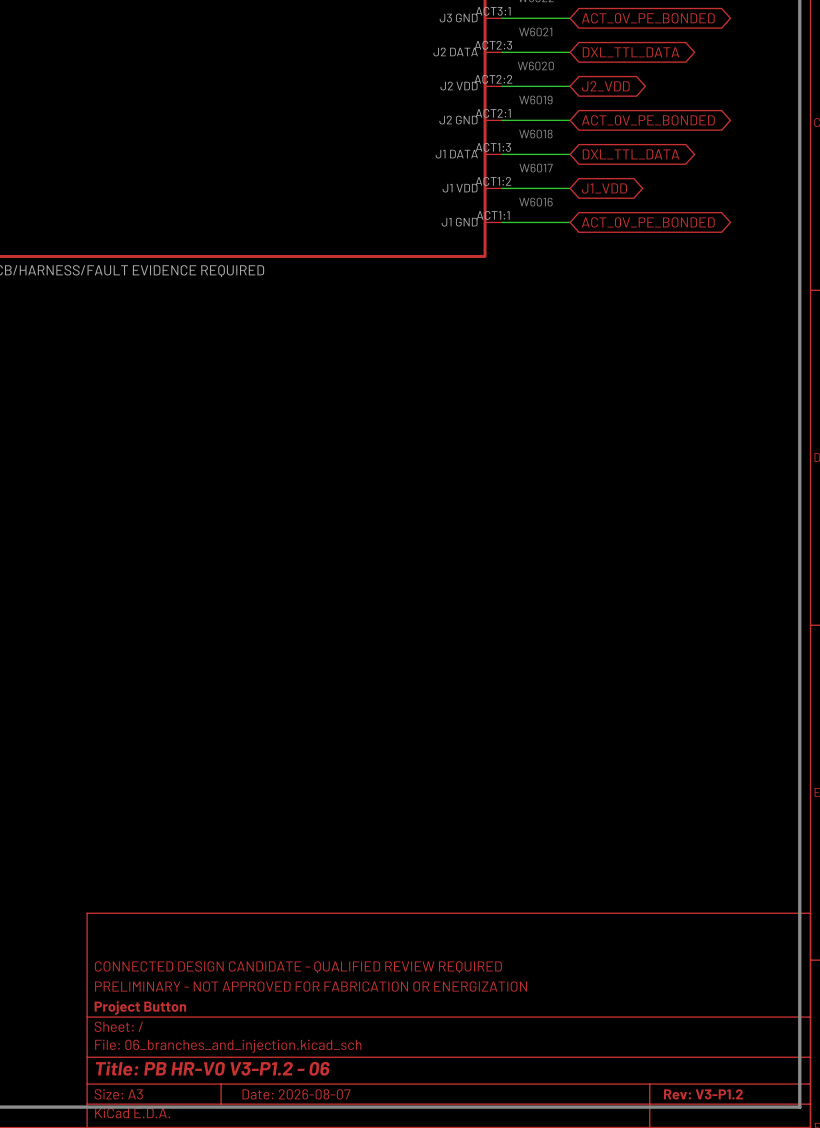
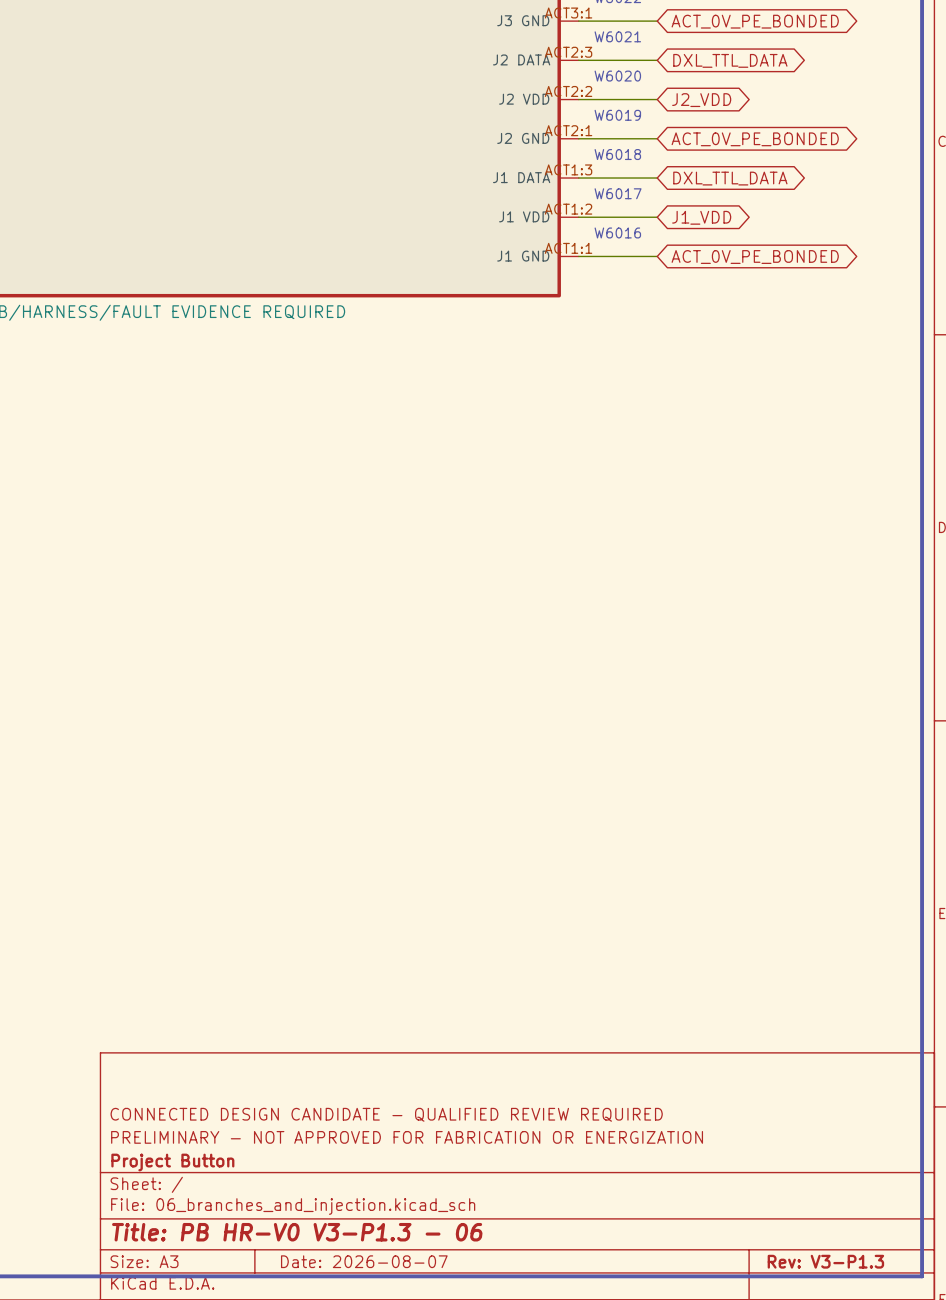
title block: Title: PB HR-V0 V3-P1.2 - 06 (212, 1068) -> Title: PB HR-V0 V3-P1.3 - 06 (297, 1232)
title block: Rev: V3-P1.2 (703, 1094) -> Rev: V3-P1.3 (825, 1261)

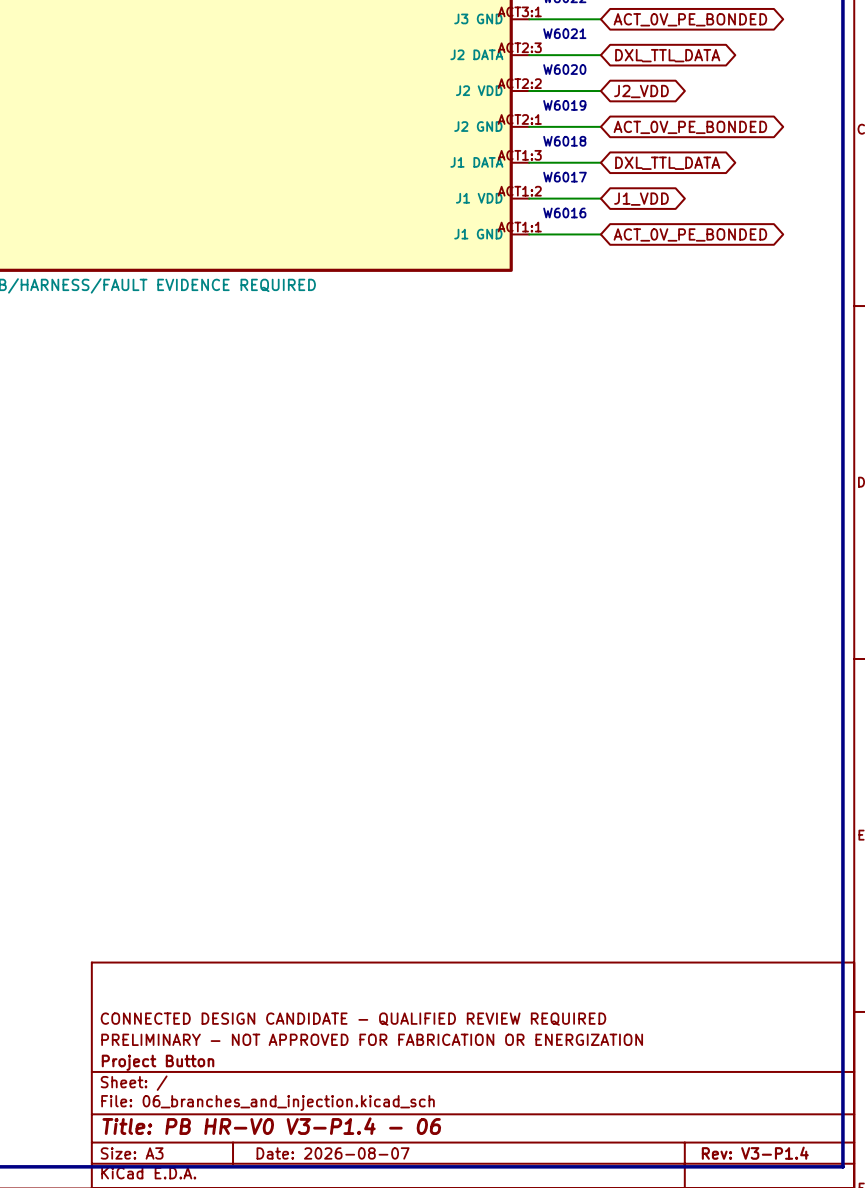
title block: Title: PB HR-V0 V3-P1.3 - 06 (297, 1232) -> Title: PB HR-V0 V3-P1.4 - 06 (271, 1126)
title block: Rev: V3-P1.3 (825, 1261) -> Rev: V3-P1.4 (755, 1153)

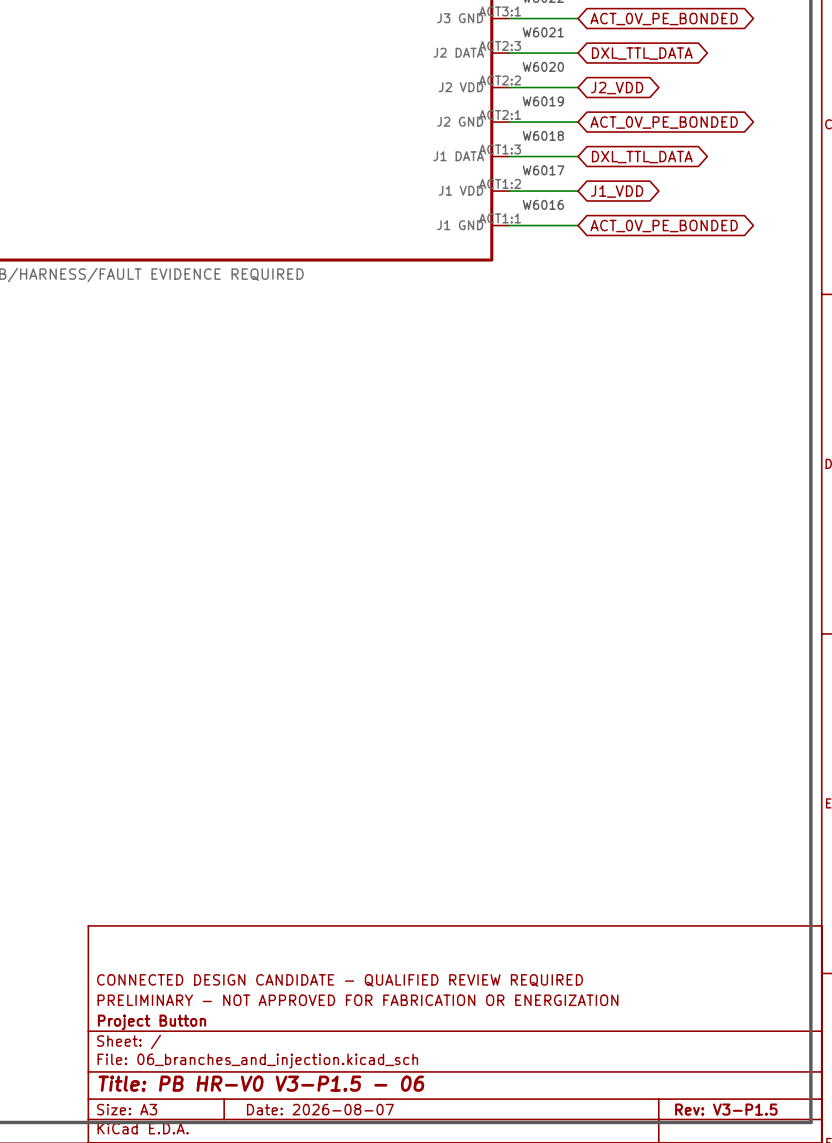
title block: Title: PB HR-V0 V3-P1.4 - 06 (271, 1126) -> Title: PB HR-V0 V3-P1.5 - 06 (261, 1083)
title block: Rev: V3-P1.4 (755, 1153) -> Rev: V3-P1.5 (726, 1109)

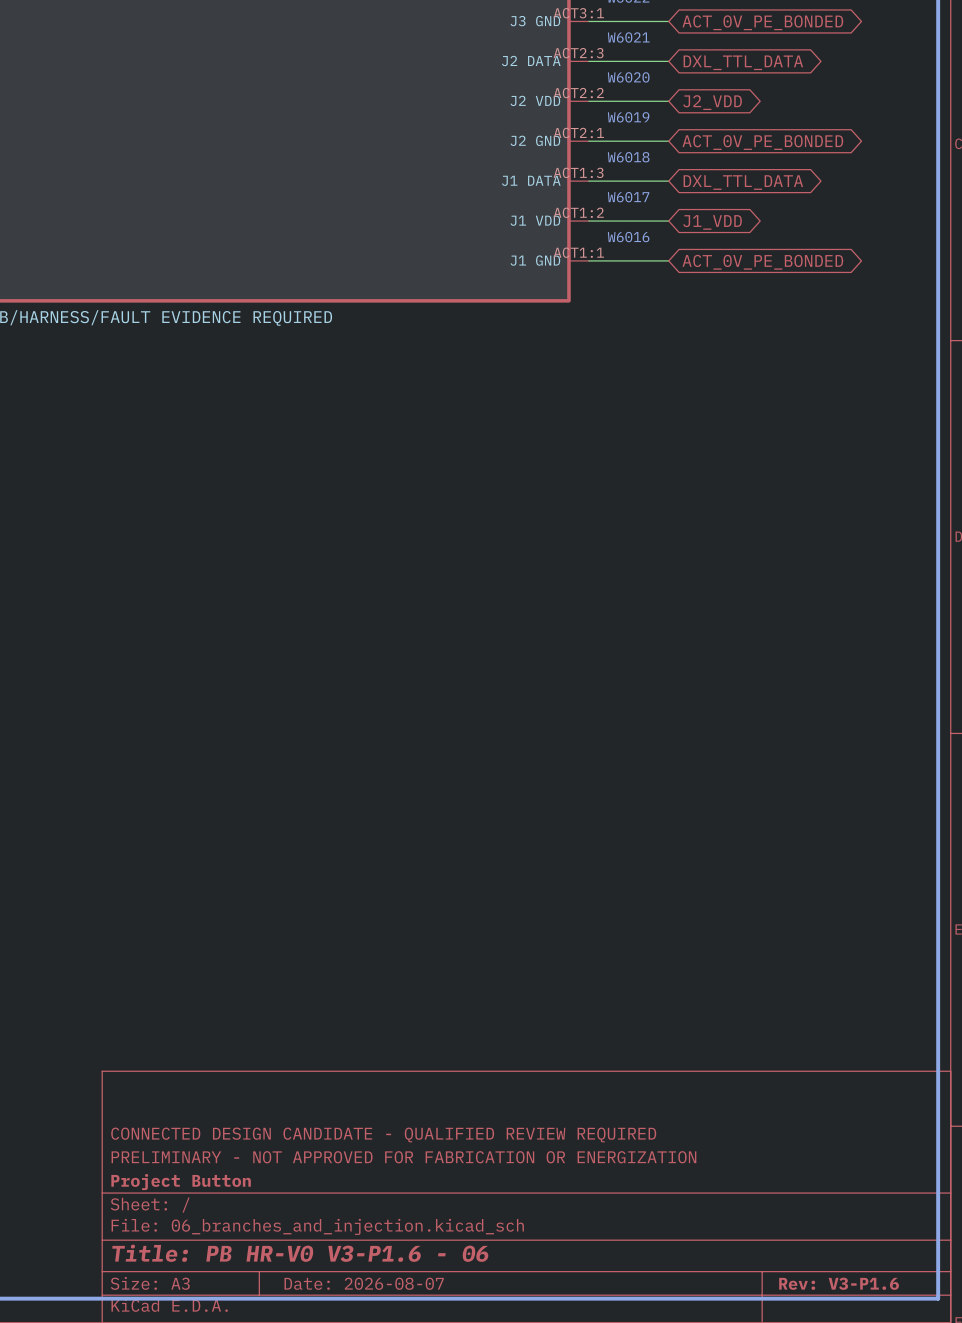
title block: Title: PB HR-V0 V3-P1.5 - 06 (261, 1083) -> Title: PB HR-V0 V3-P1.6 - 06 (300, 1253)
title block: Rev: V3-P1.5 (726, 1109) -> Rev: V3-P1.6 (839, 1283)

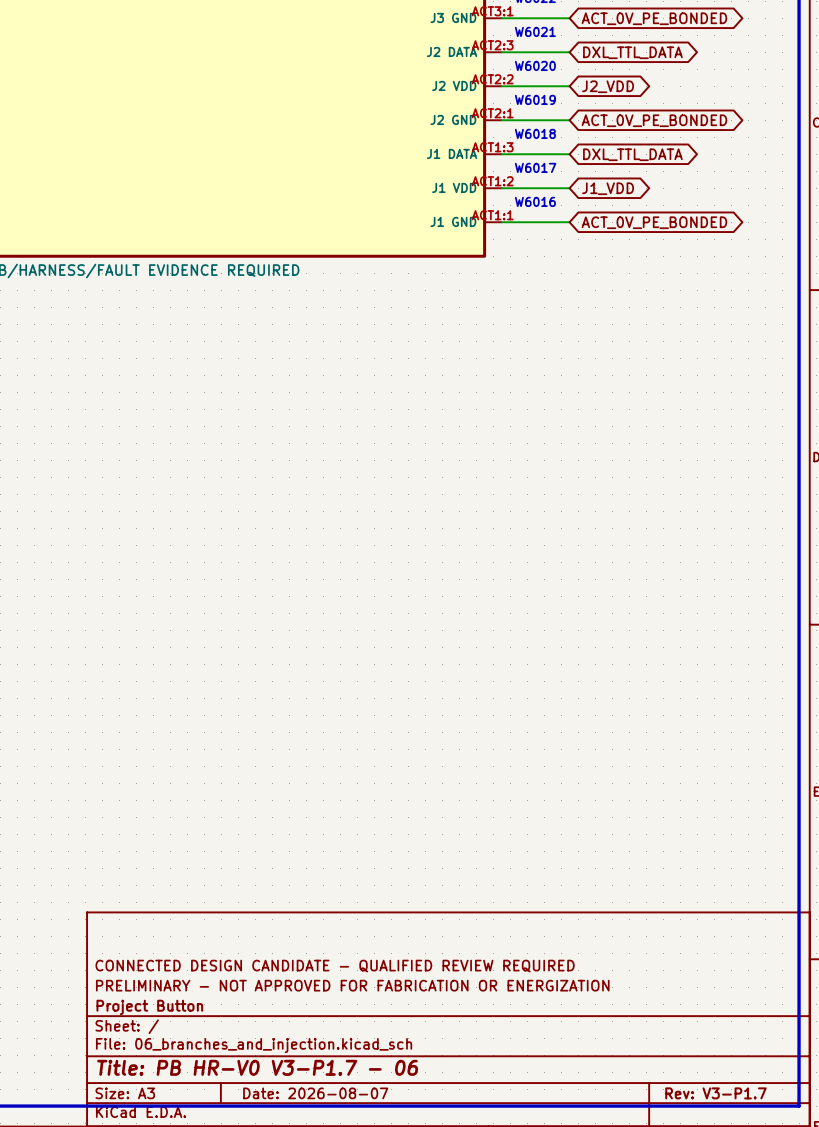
title block: Title: PB HR-V0 V3-P1.6 - 06 (300, 1253) -> Title: PB HR-V0 V3-P1.7 - 06 (257, 1067)
title block: Rev: V3-P1.6 (839, 1283) -> Rev: V3-P1.7 (715, 1093)

